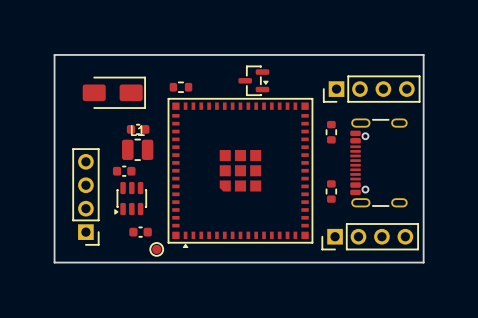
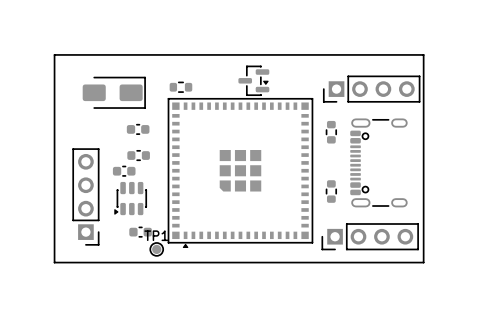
L1: (137, 149) -> none
part: none -> (138, 155)
TP1 name: none -> TP1 (156, 235)

